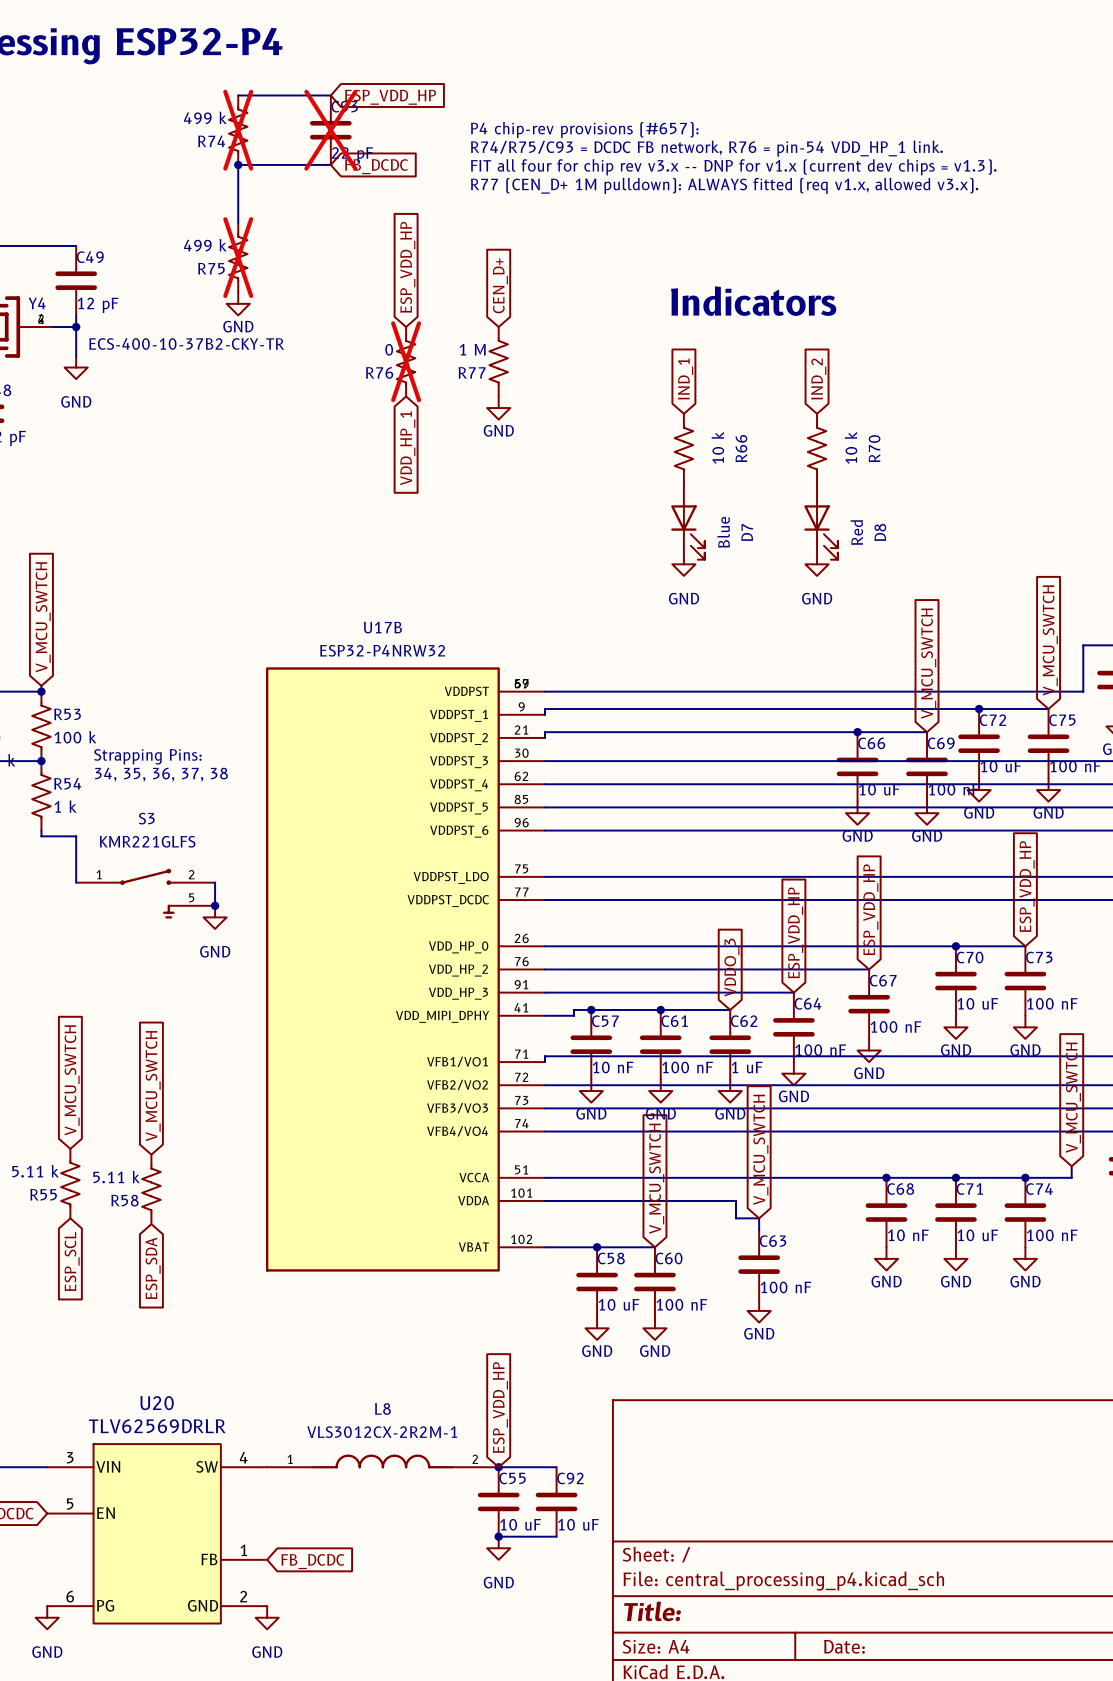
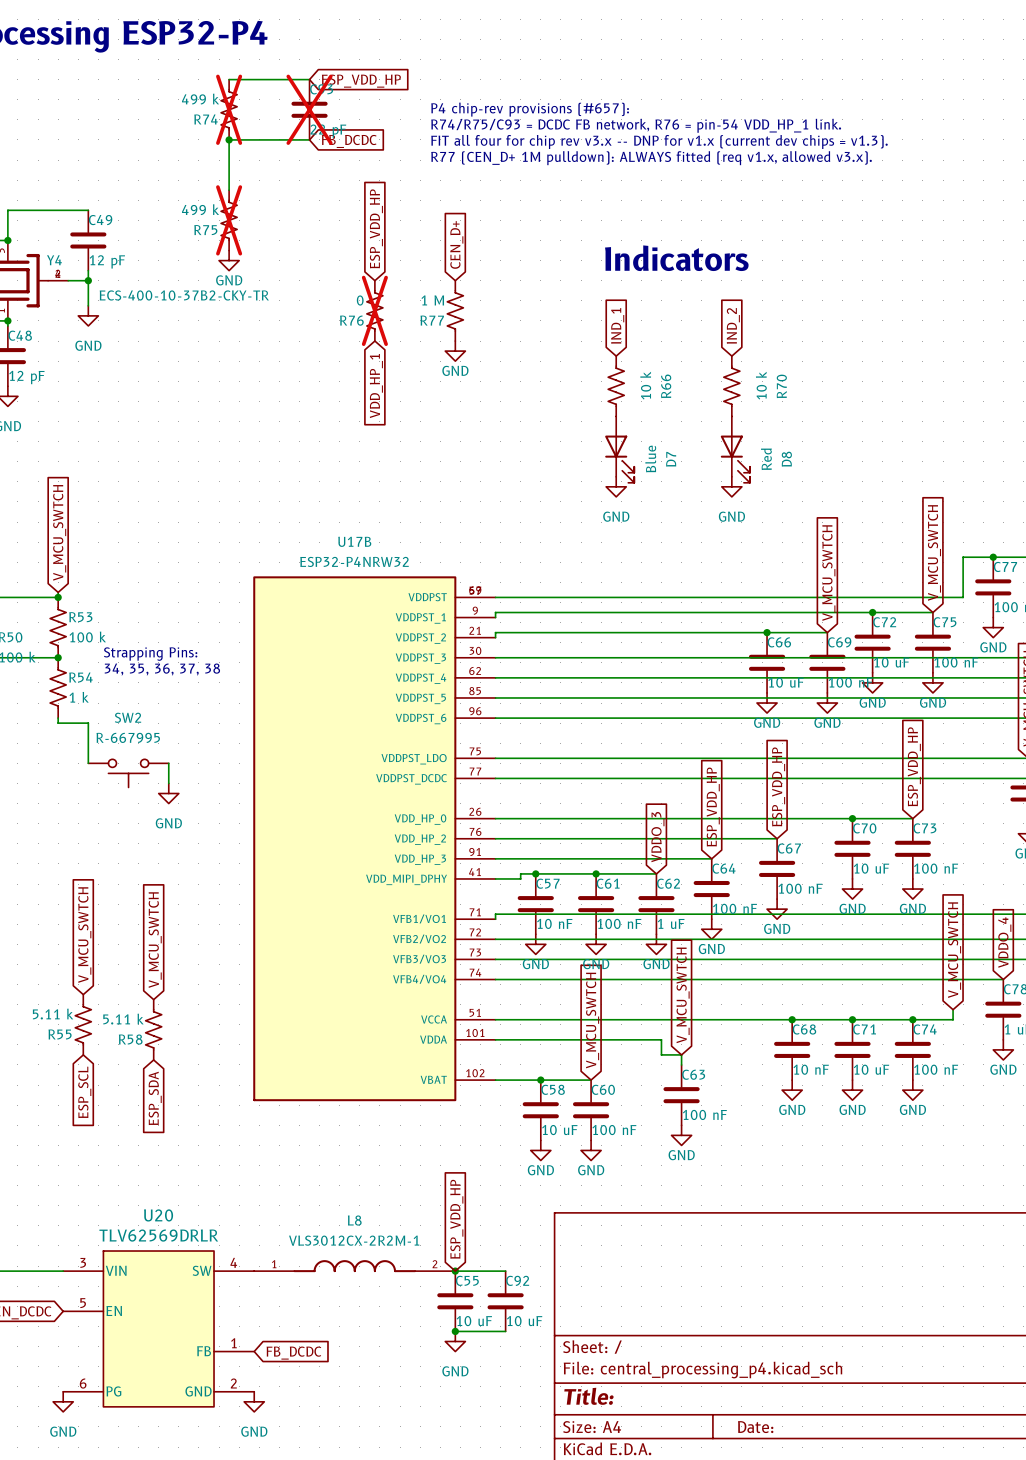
wire: (215, 882) (215, 905) -> (168, 763) (168, 783)
S3: KMR221GLFS (145, 893) -> none
SW2: none -> R-667995 (128, 773)
junction: (215, 905) -> none
power symbol position: GND (215, 917) -> GND (168, 793)

